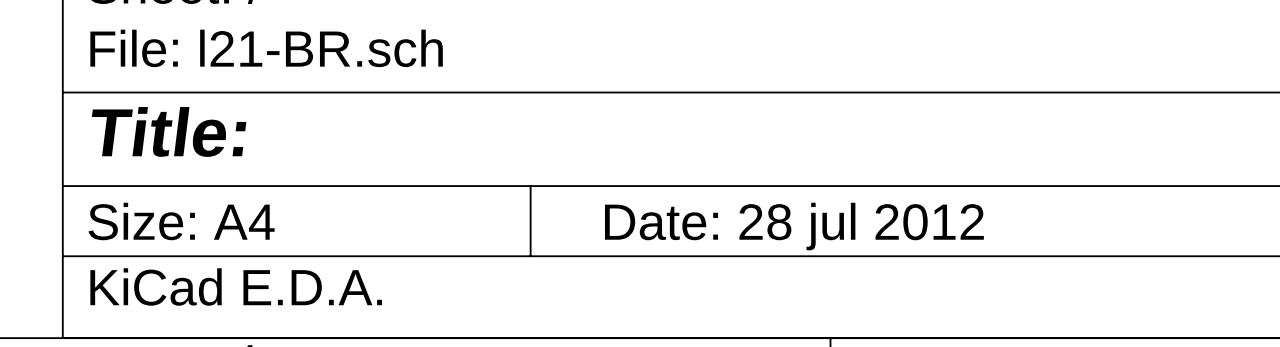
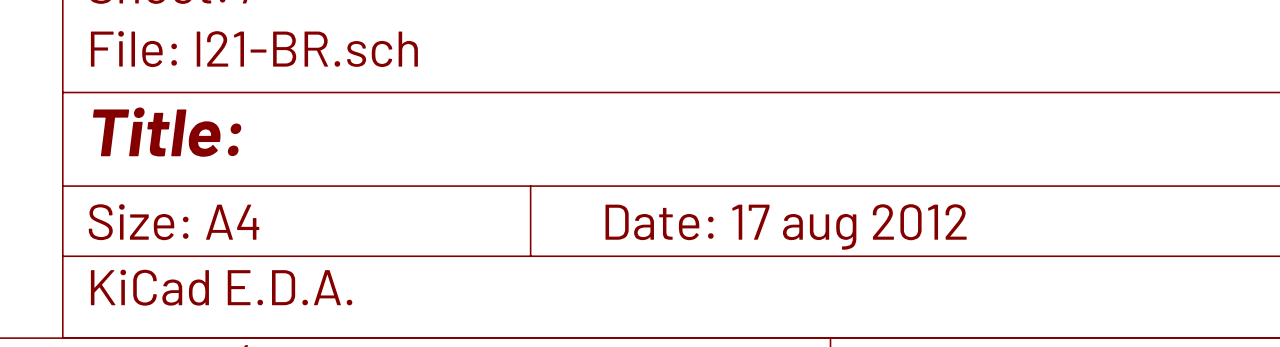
title block: Date: 28 jul 2012 (794, 226) -> Date: 17 aug 2012 (786, 226)

